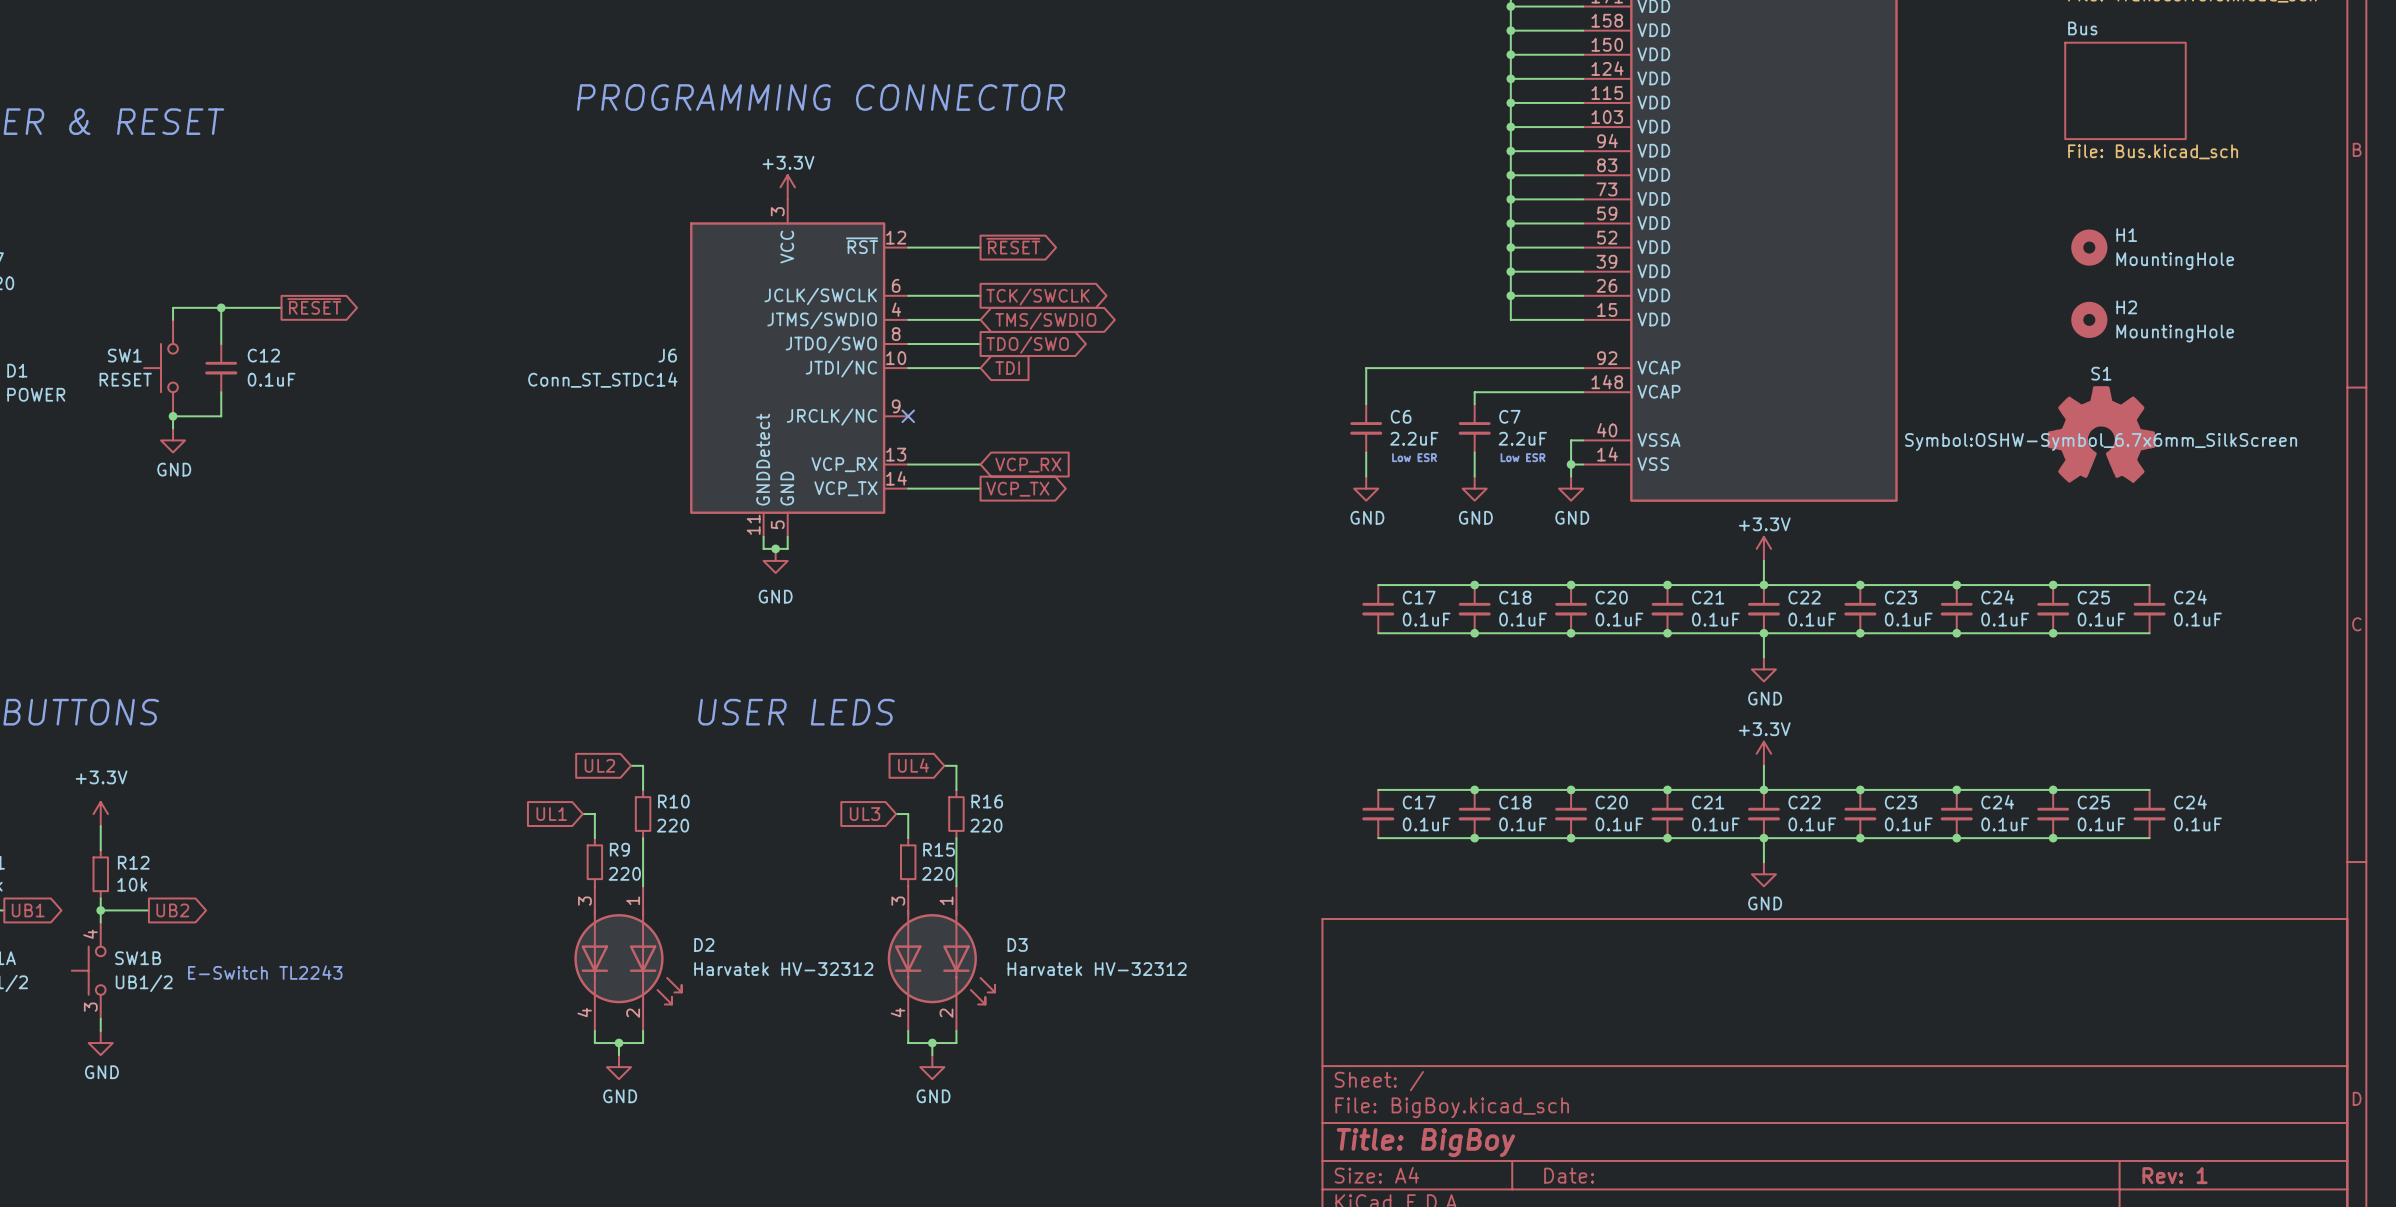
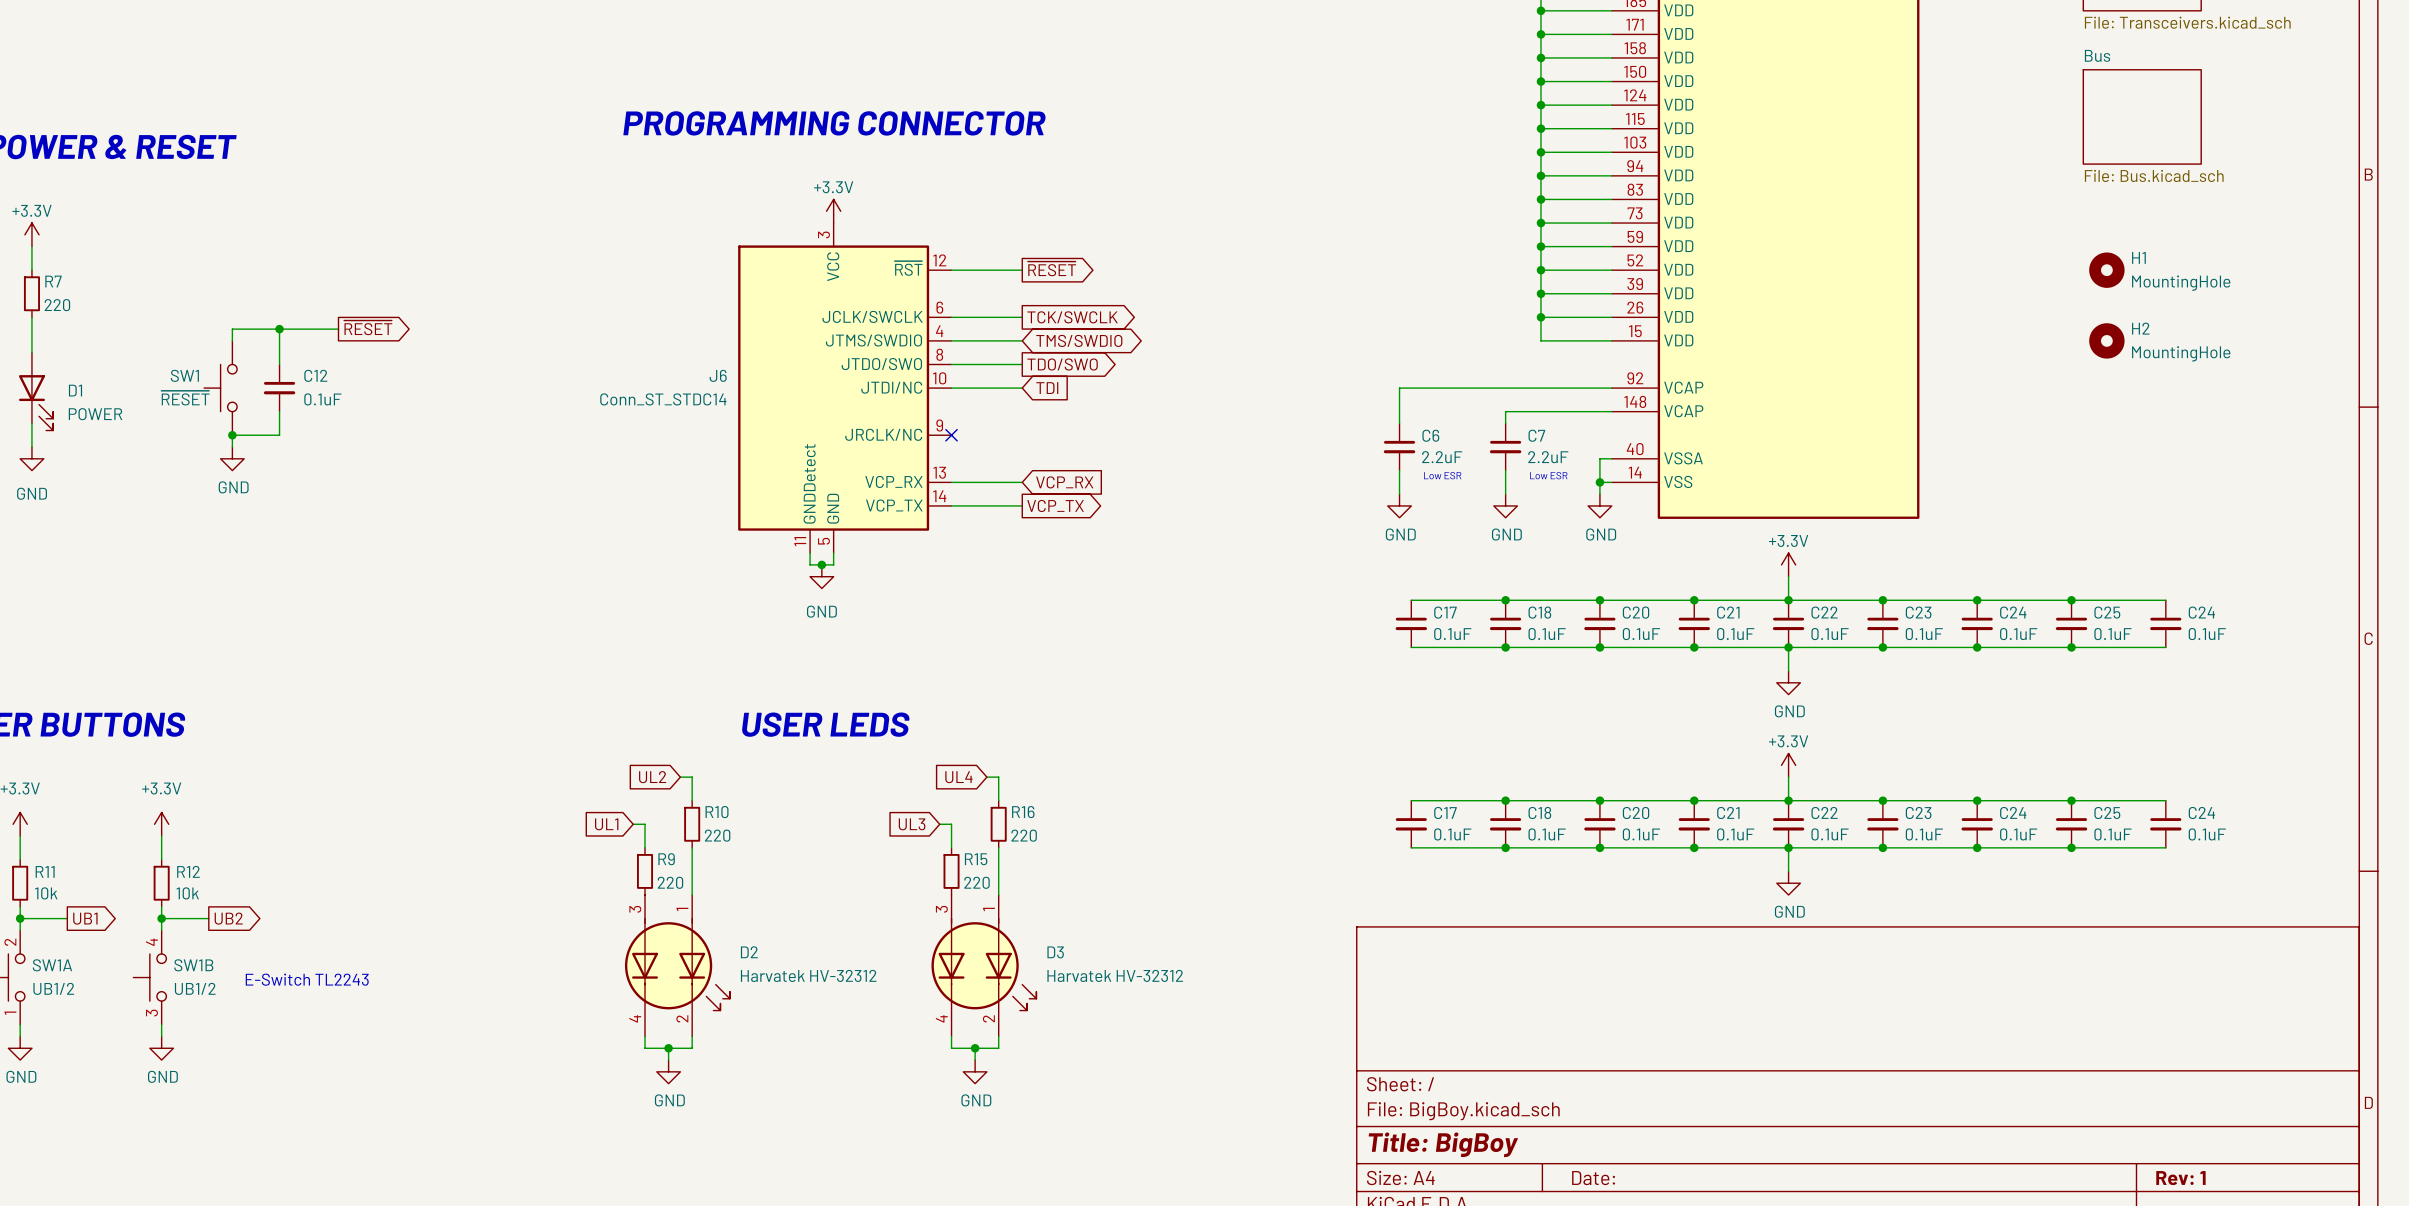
SW1 value: RESET (125, 379) -> ~{RESET} (185, 398)
S1: (2101, 434) -> none

